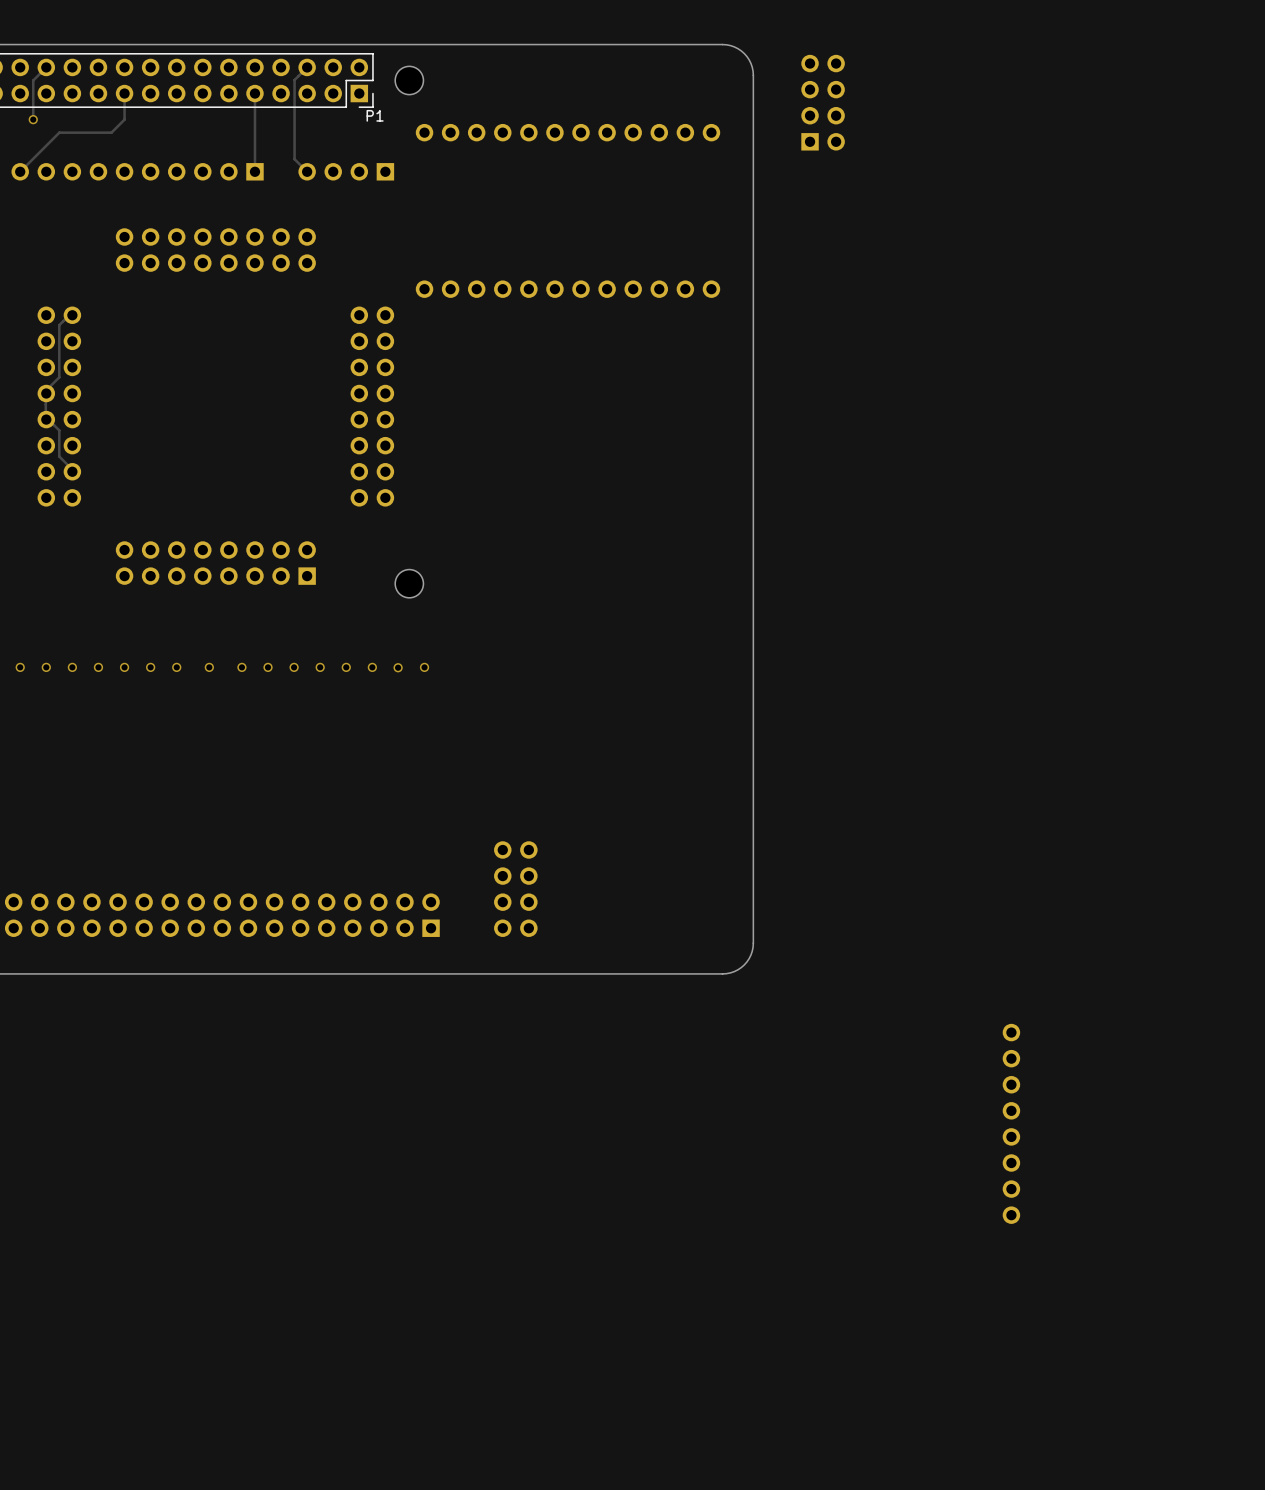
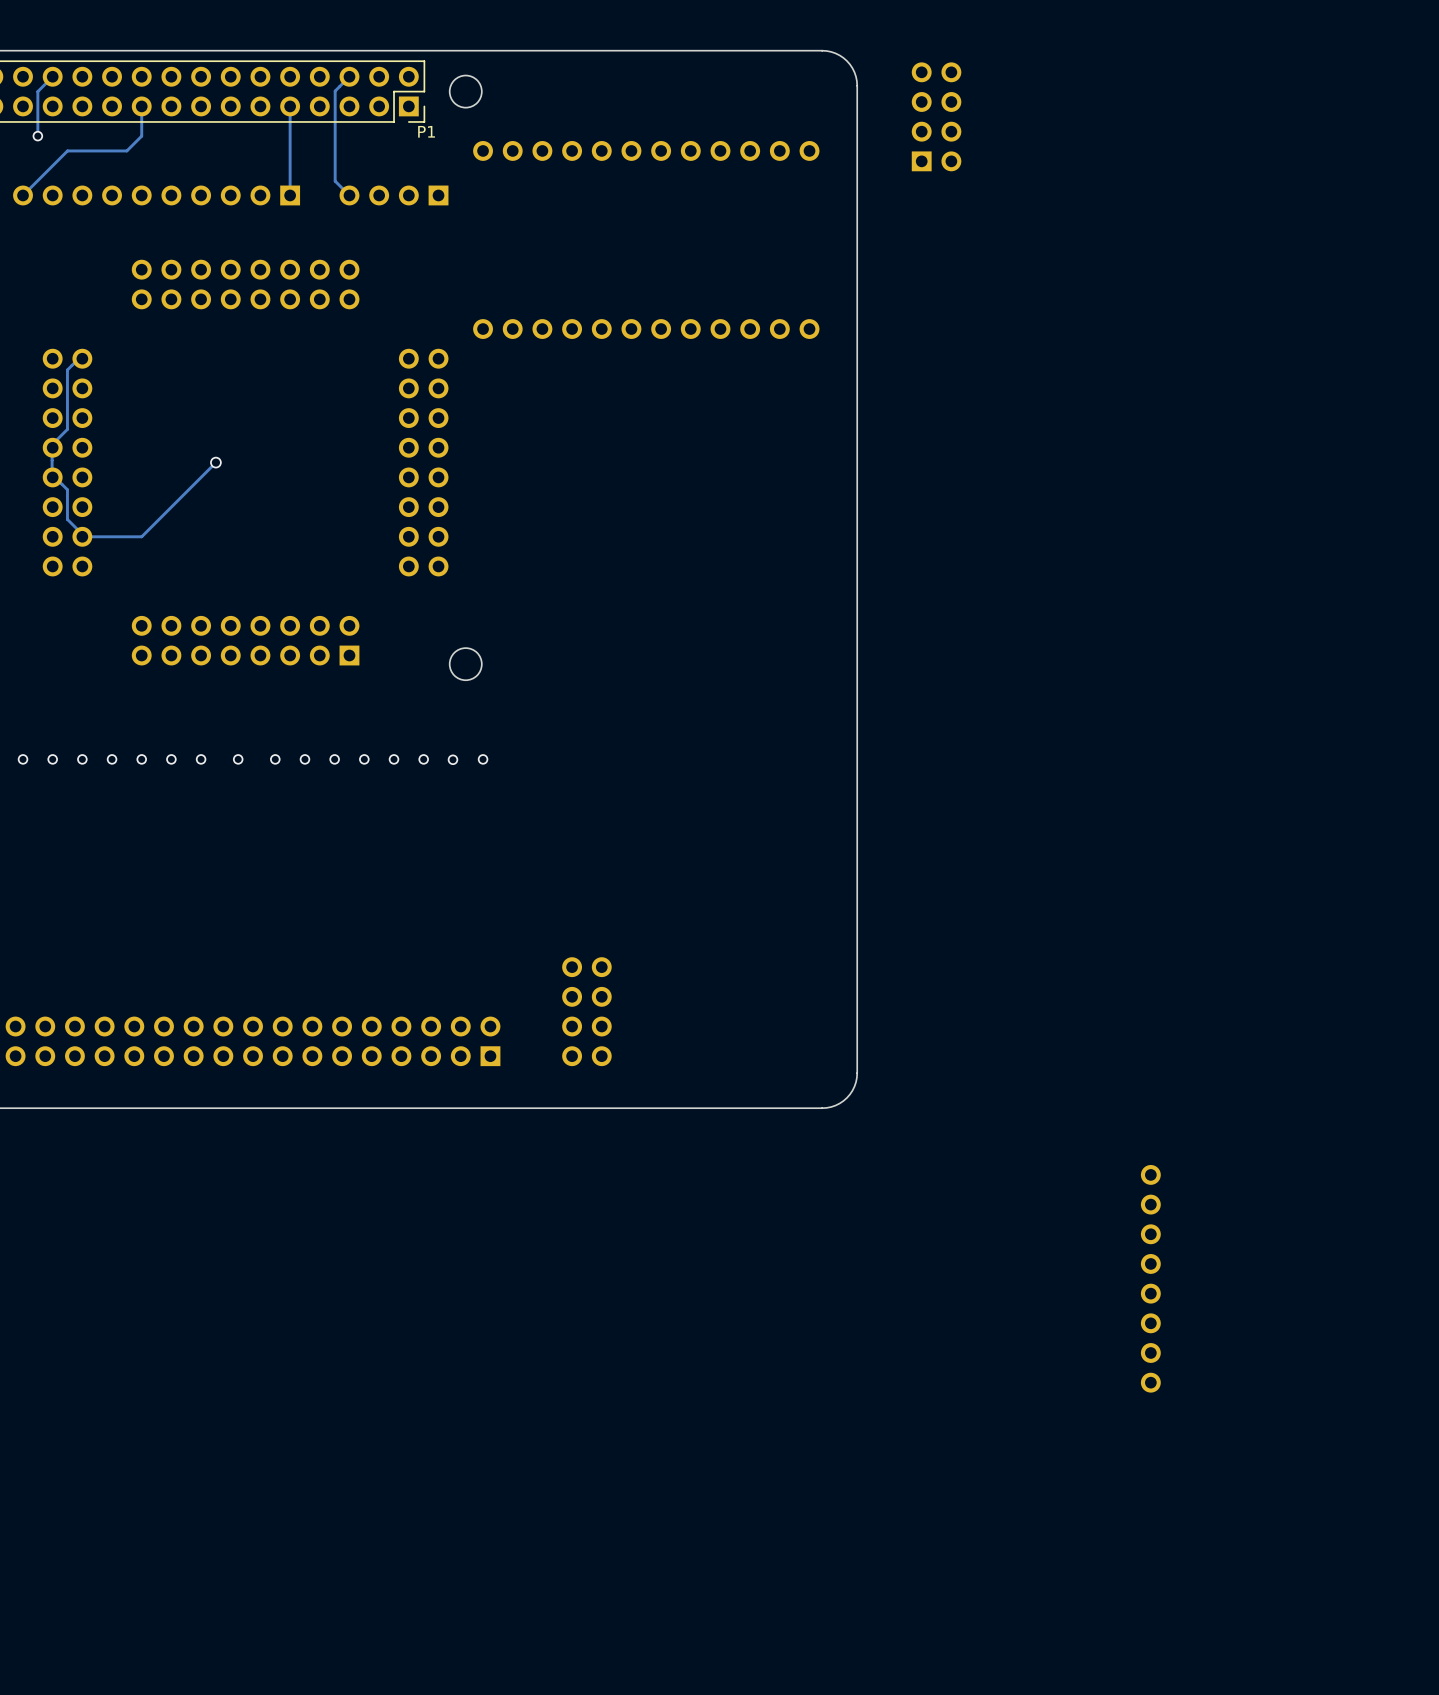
track: none -> (215, 462) (141, 536) (82, 536)
via: none -> (215, 462)

